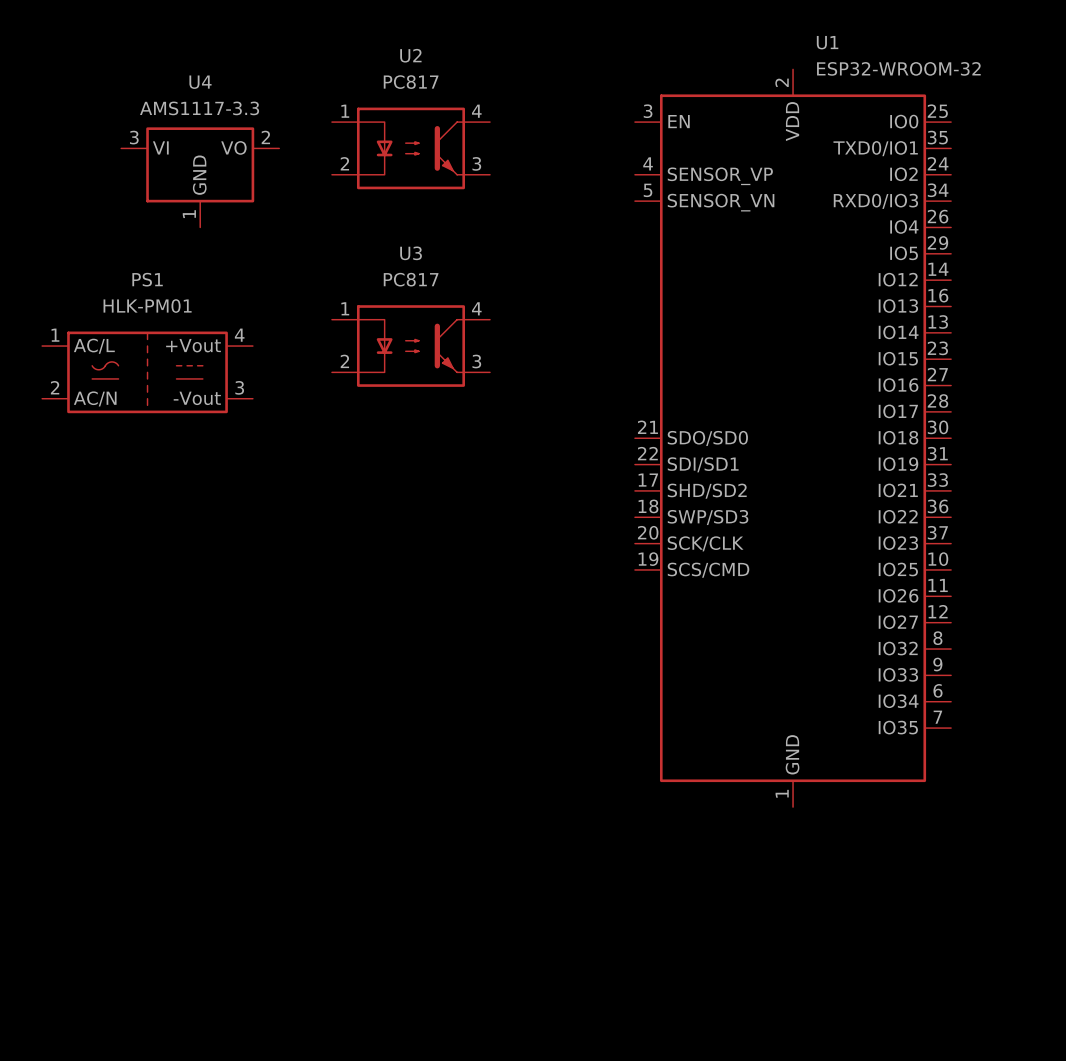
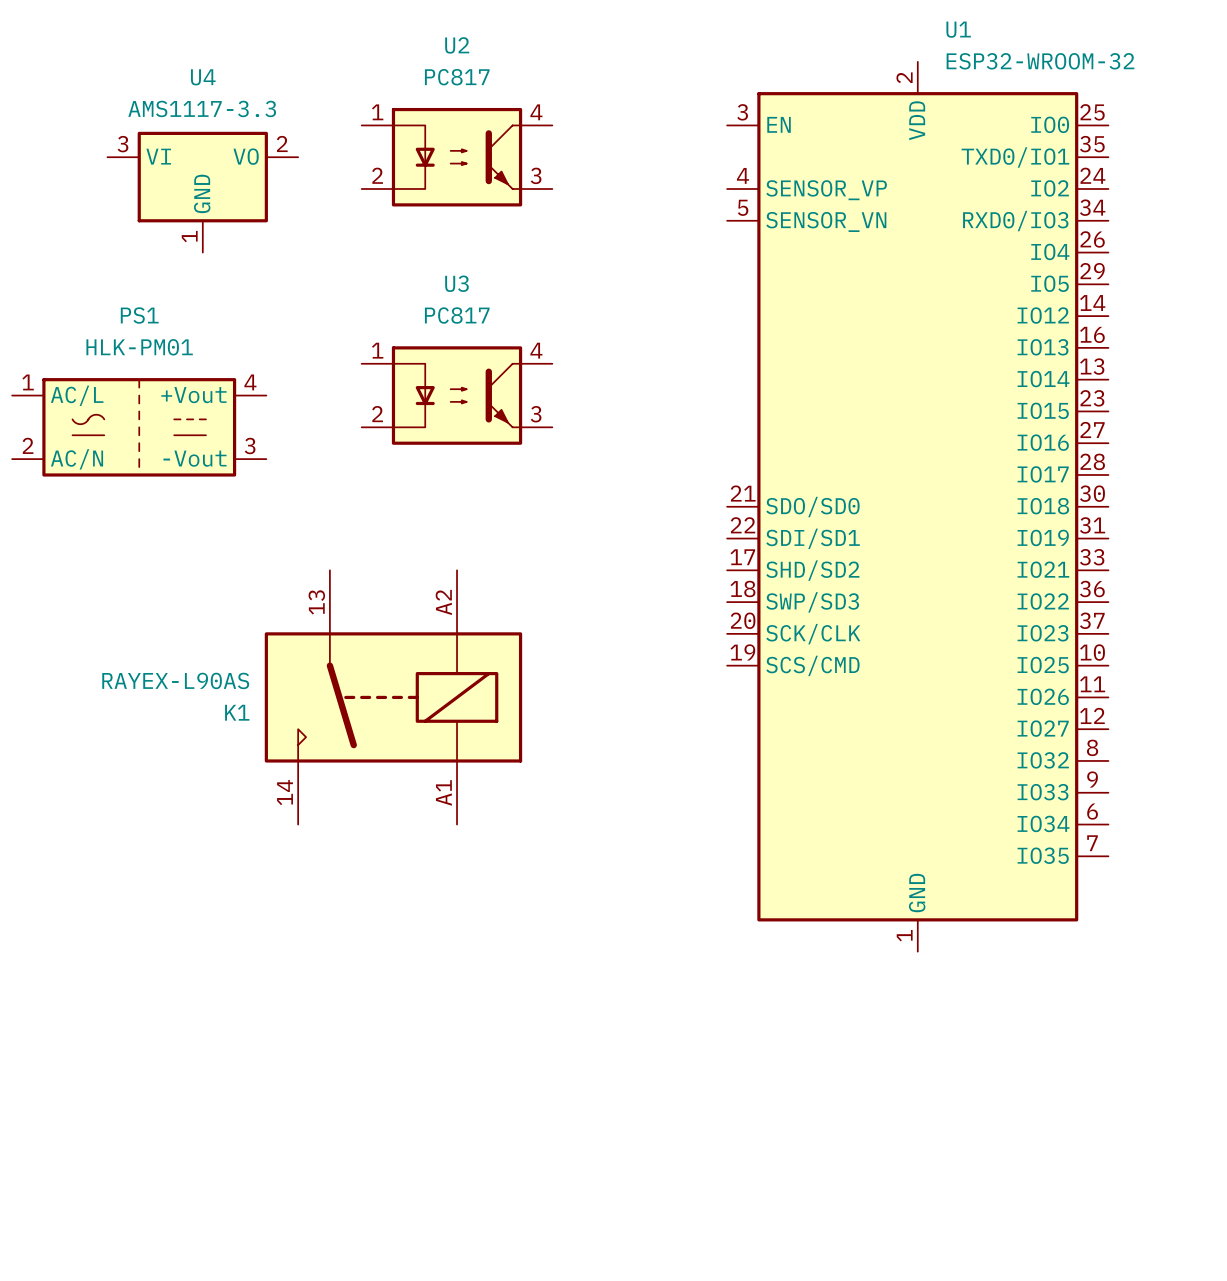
K1: none -> RAYEX-L90AS (393, 697)

